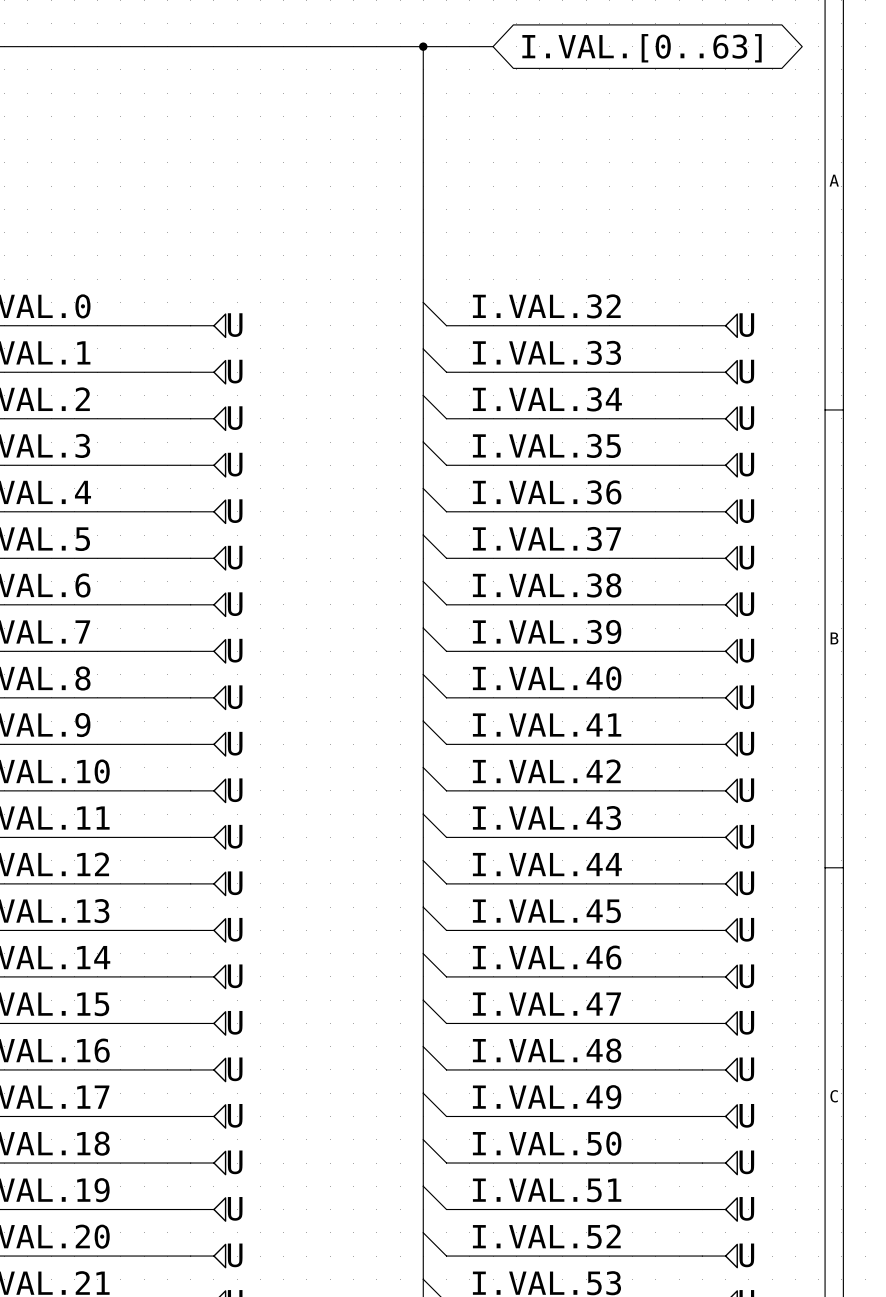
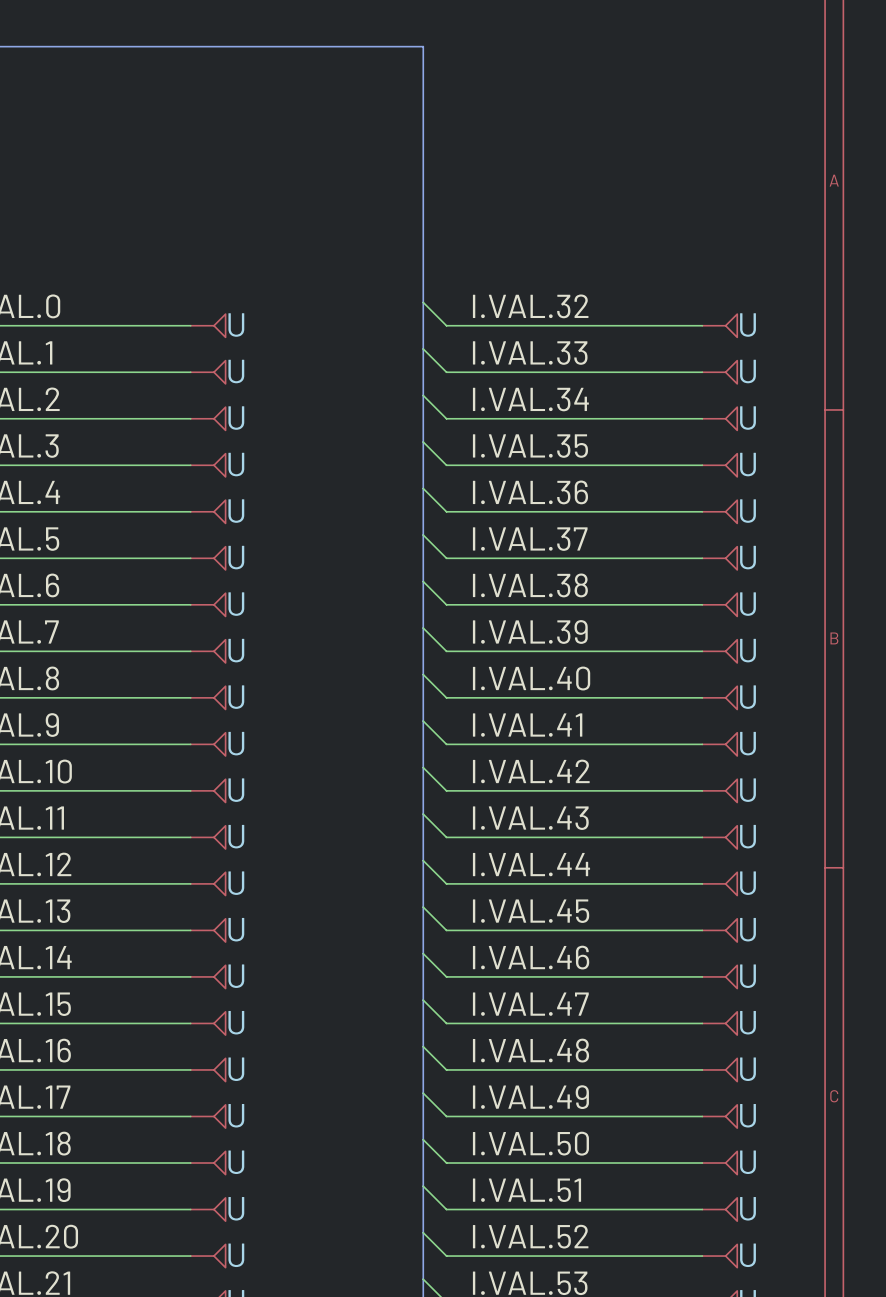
bus: (423, 46) (493, 46) -> none
junction: (423, 46) -> none
global label: I.VAL.[0..63] (642, 48) -> none

